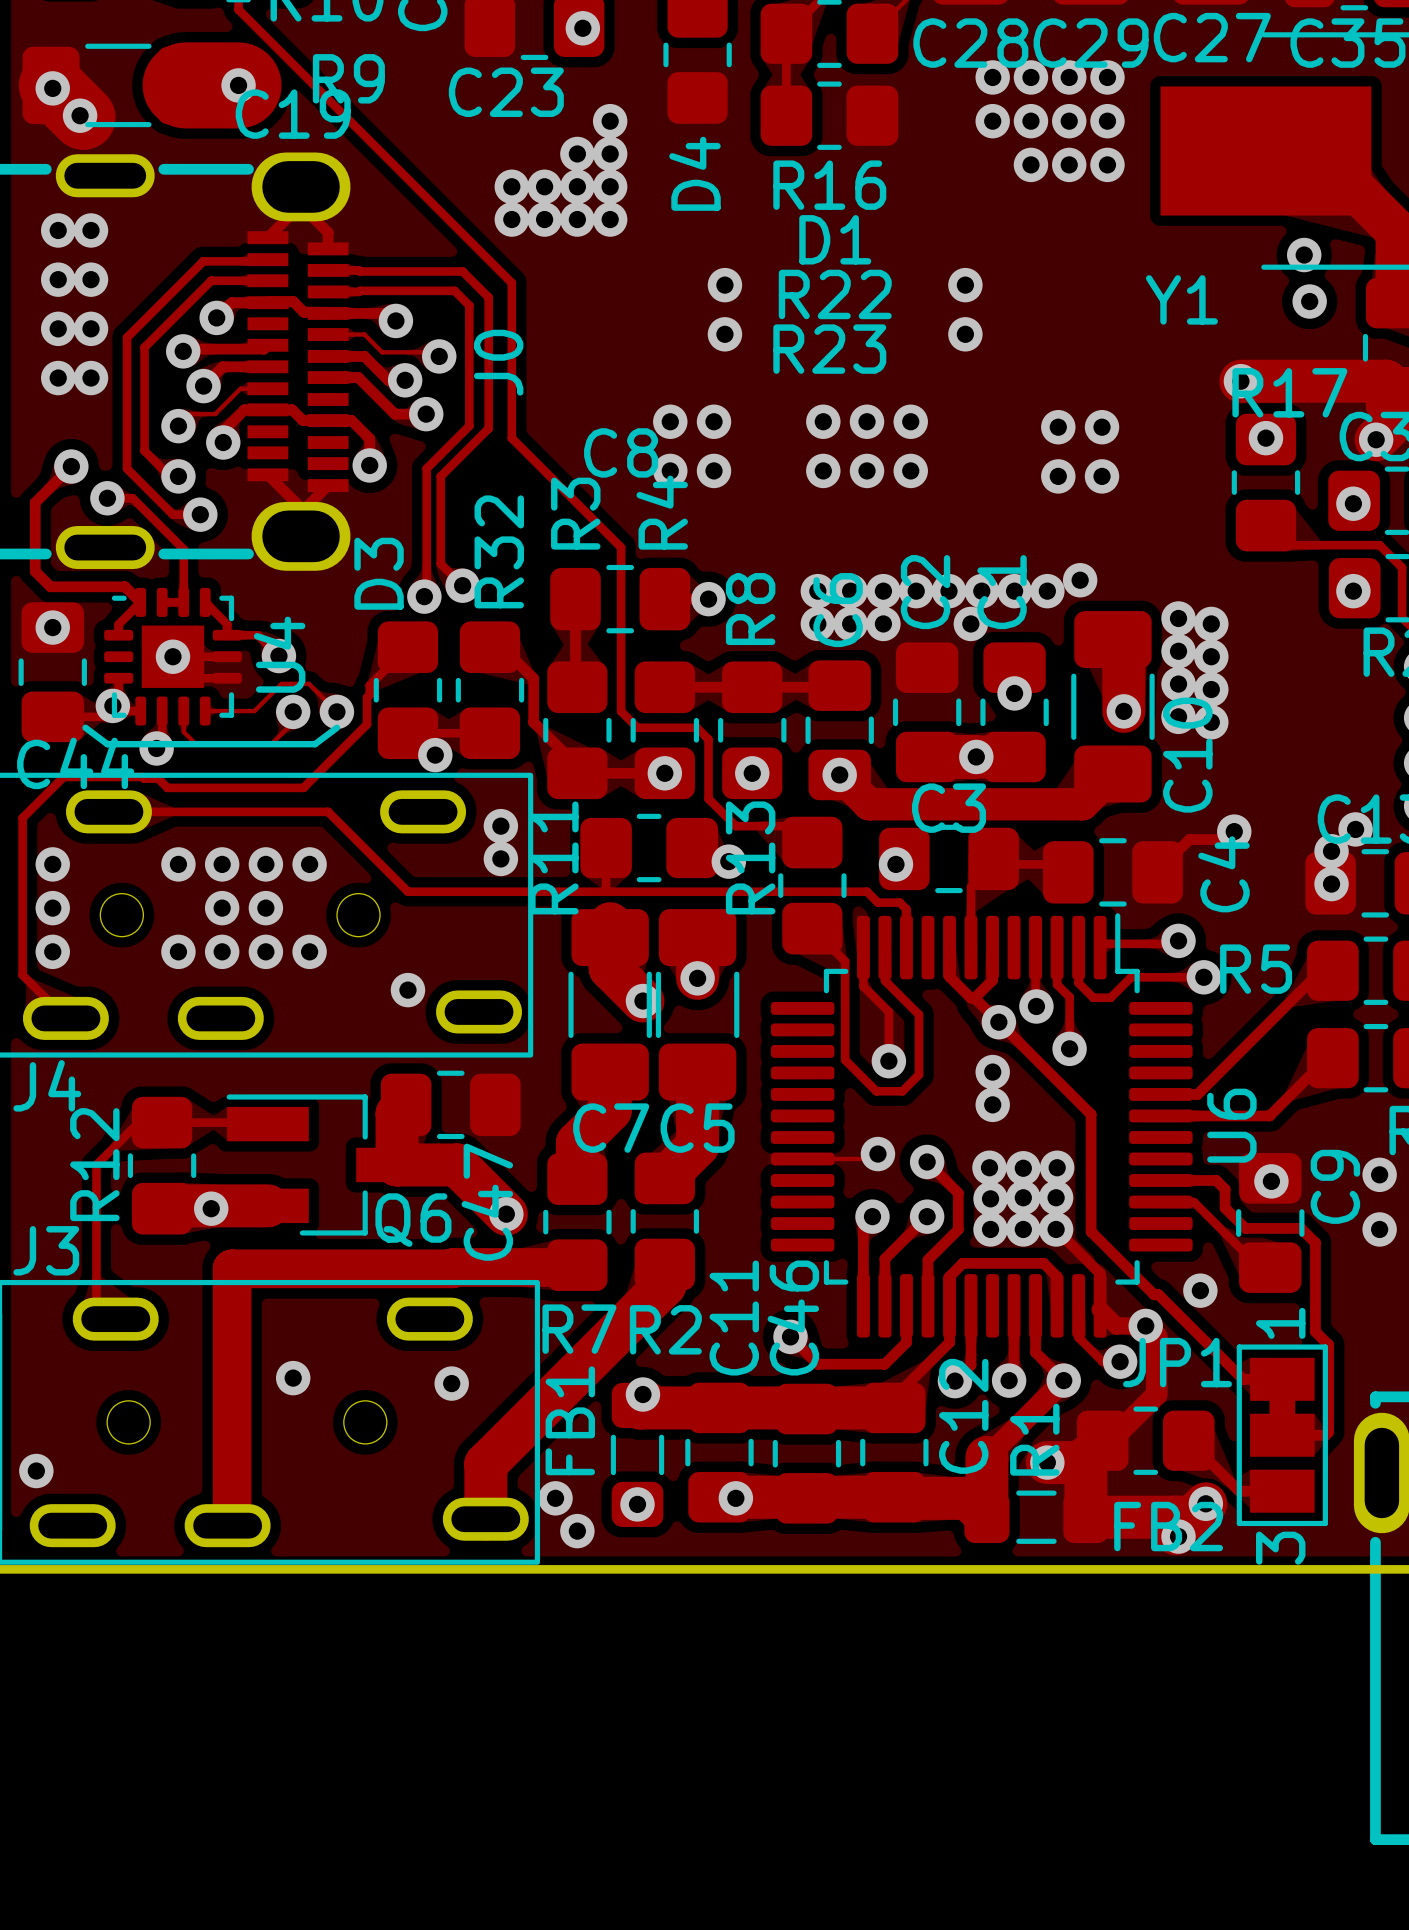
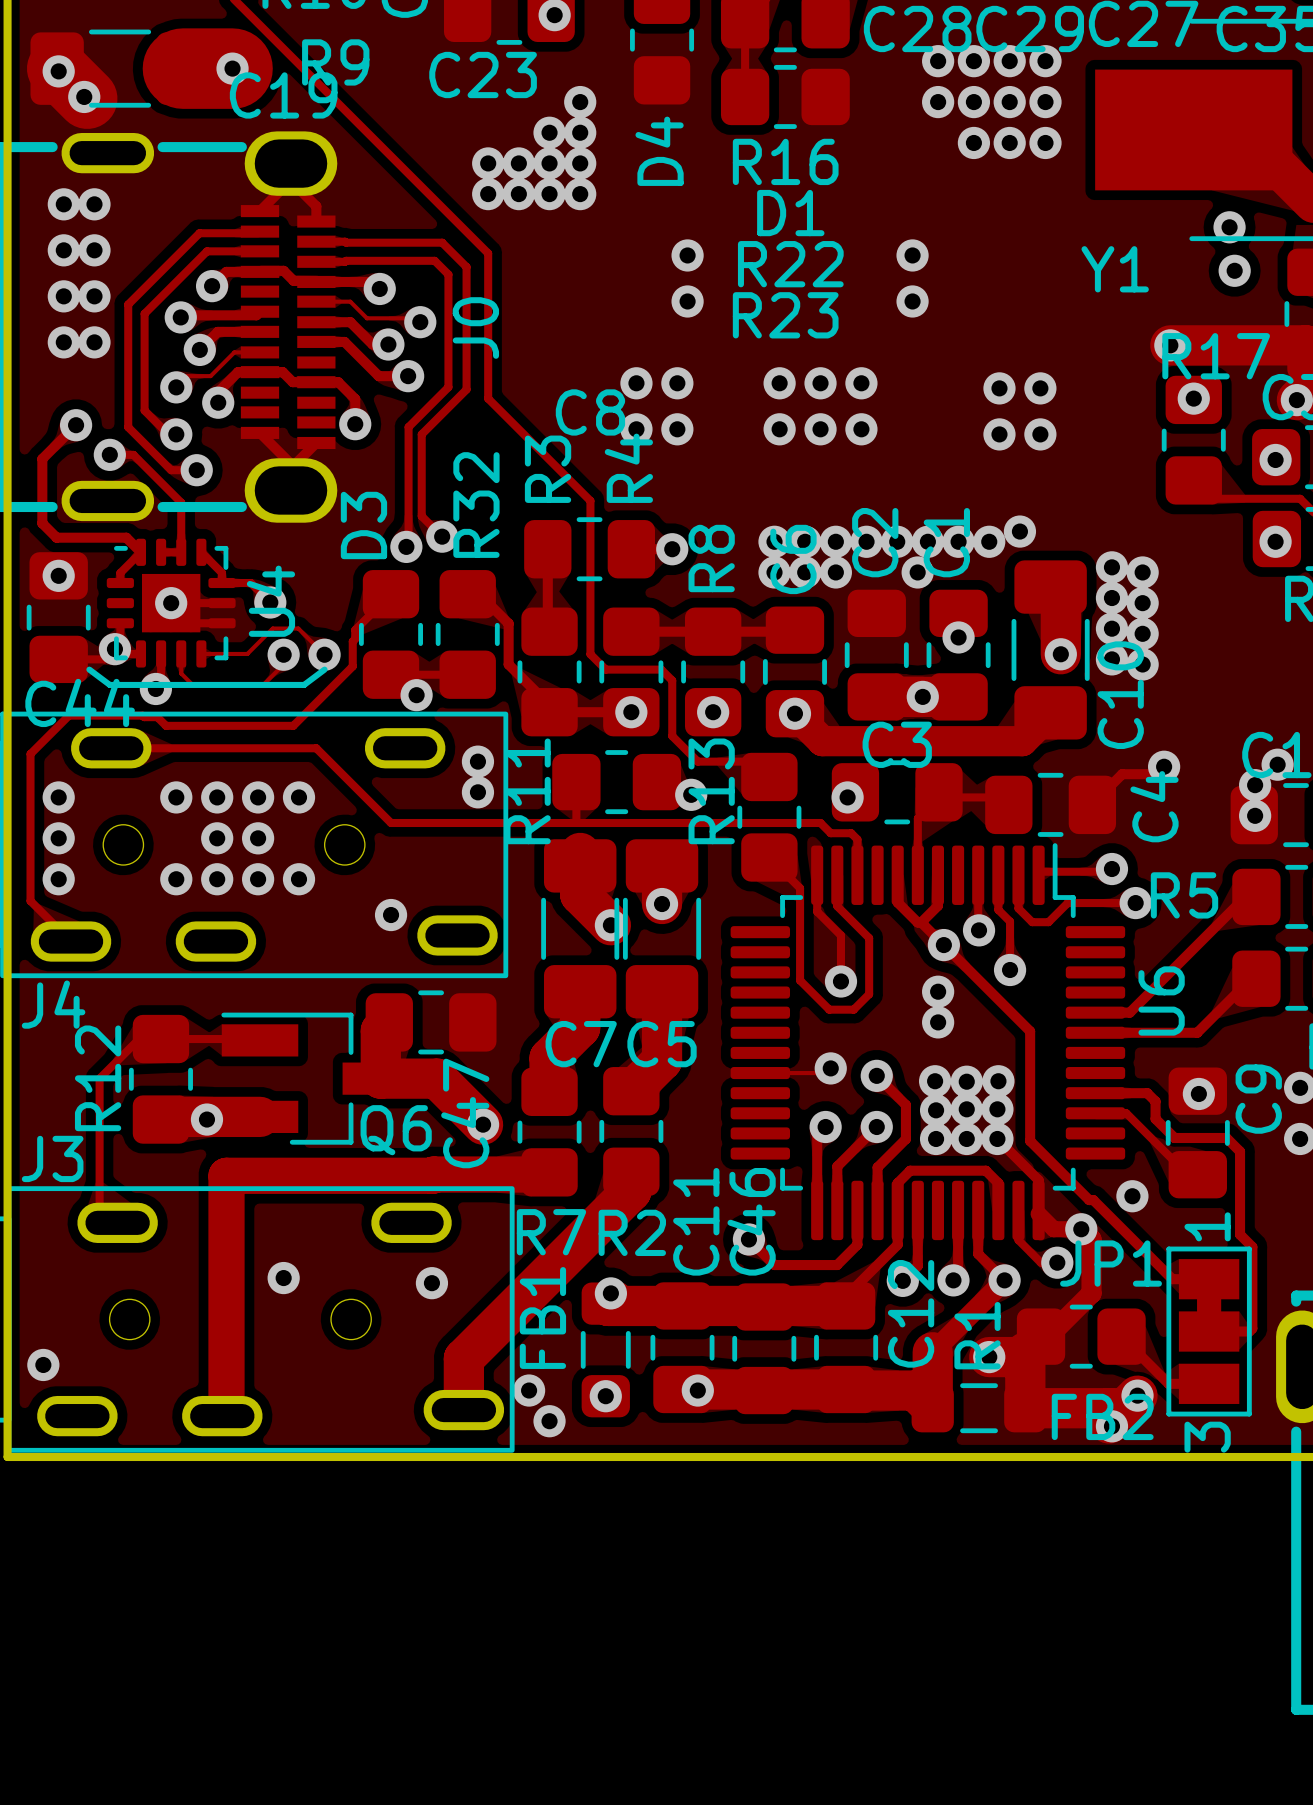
U6 name position: U6 (1231, 1125) -> U6 (1161, 1000)

